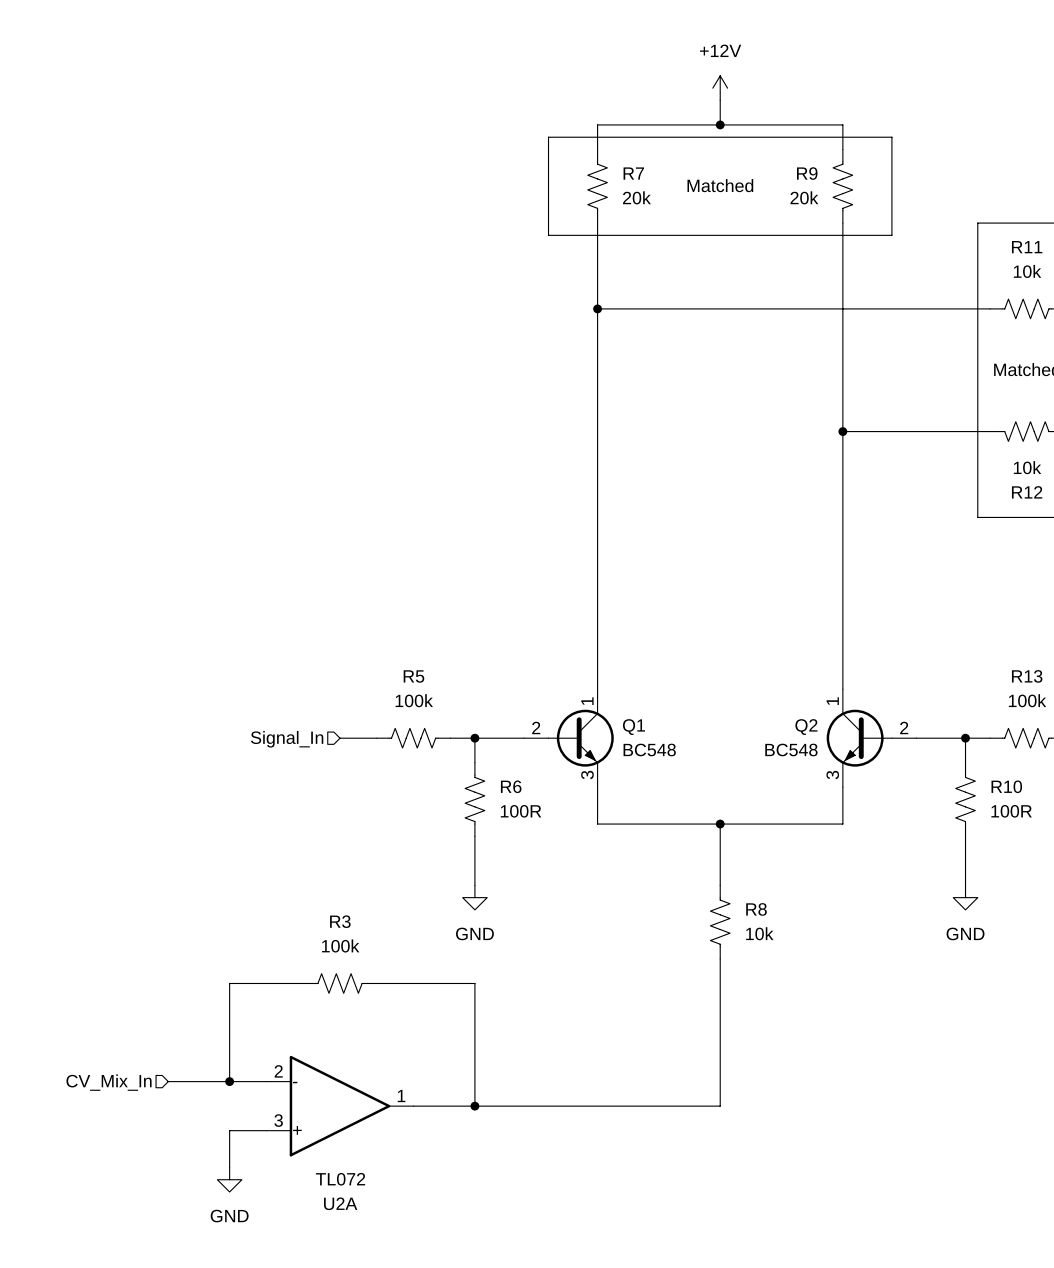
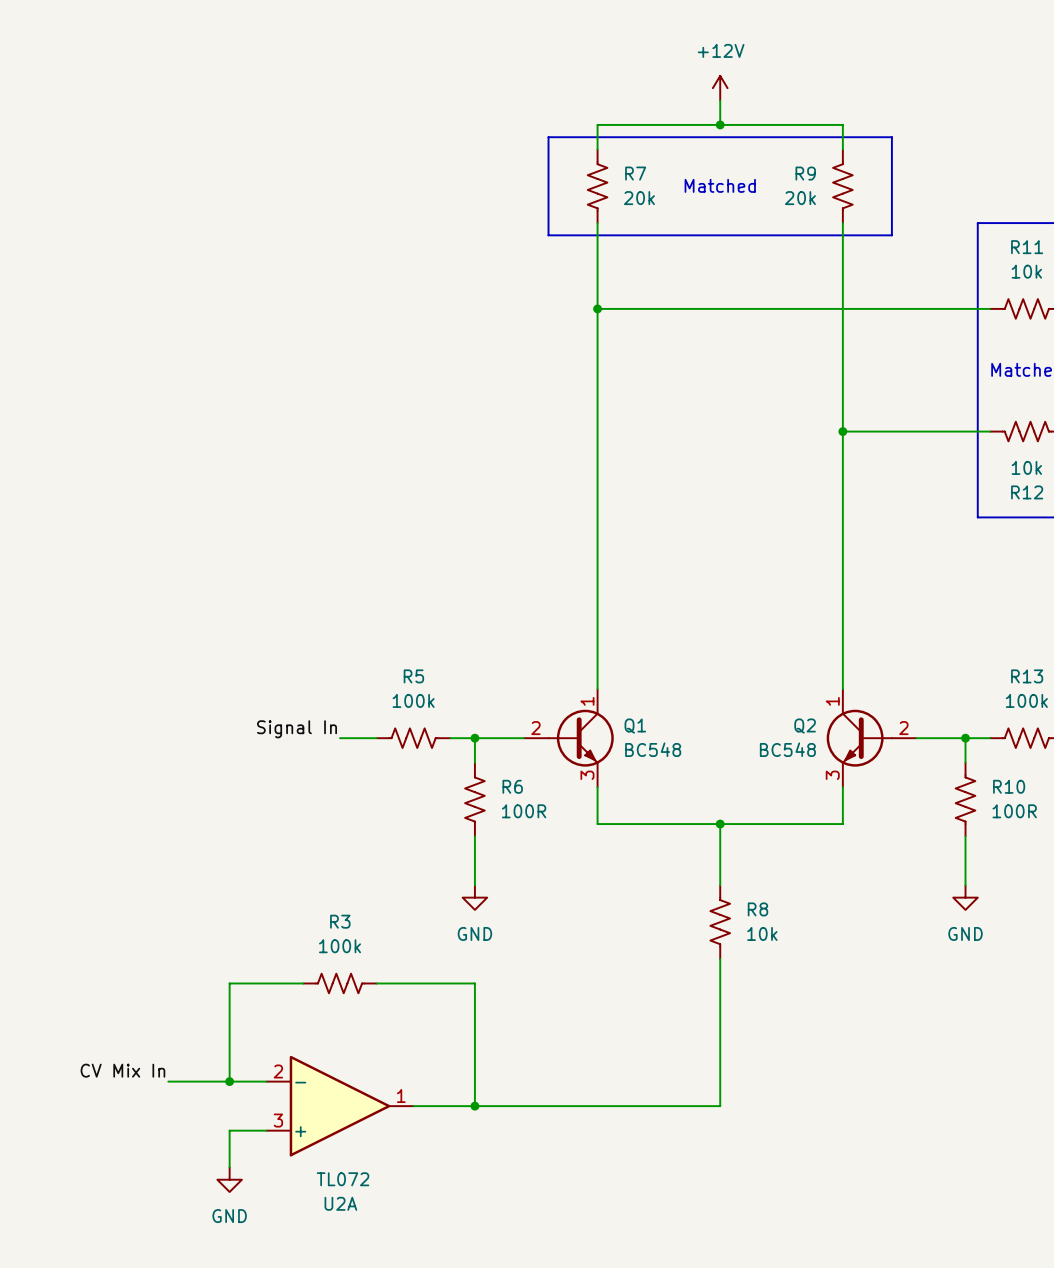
label: none -> Signal In (296, 729)
hierarchical label: Signal_In (287, 739) -> none
label: none -> CV Mix In (122, 1070)
hierarchical label: CV_Mix_In (109, 1082) -> none

